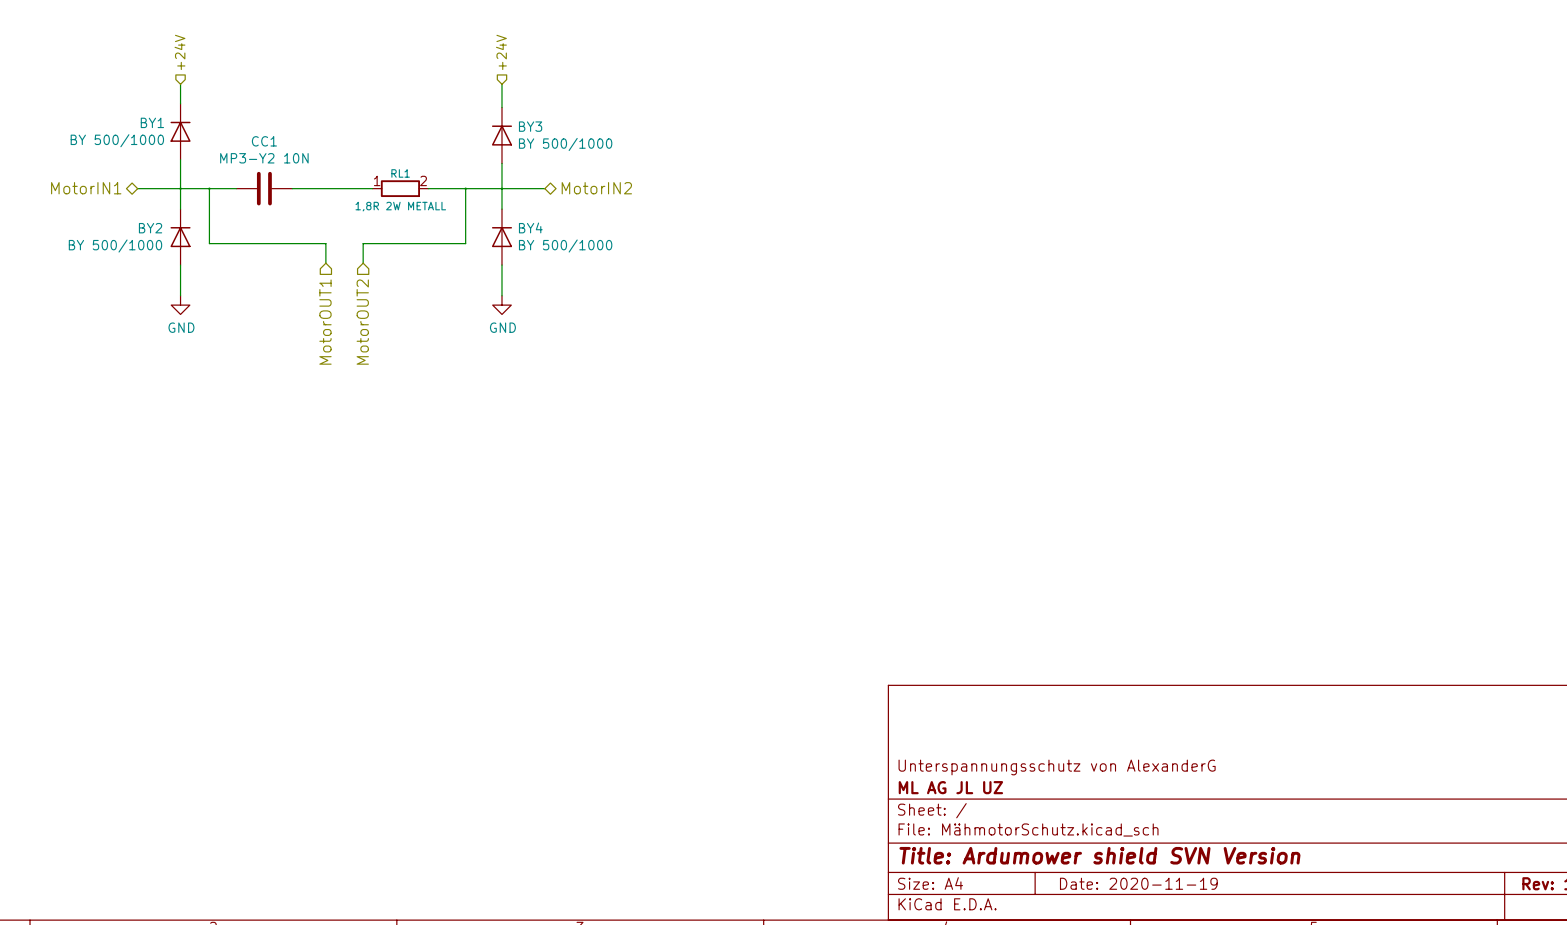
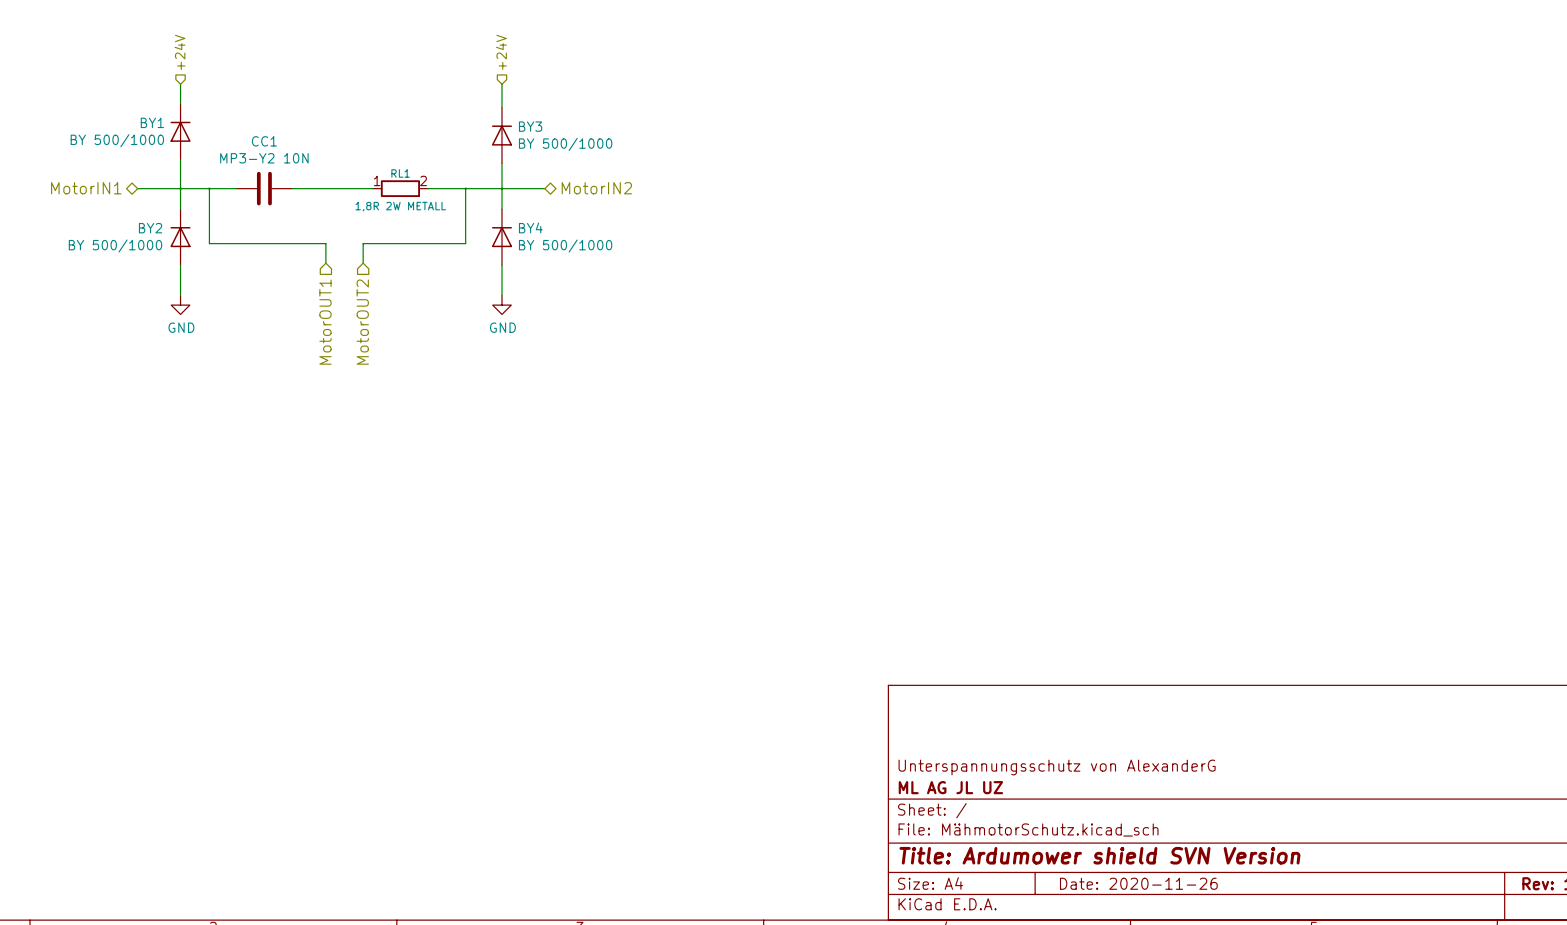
title block: Date: 2020-11-19 (1138, 883) -> Date: 2020-11-26 (1138, 883)

